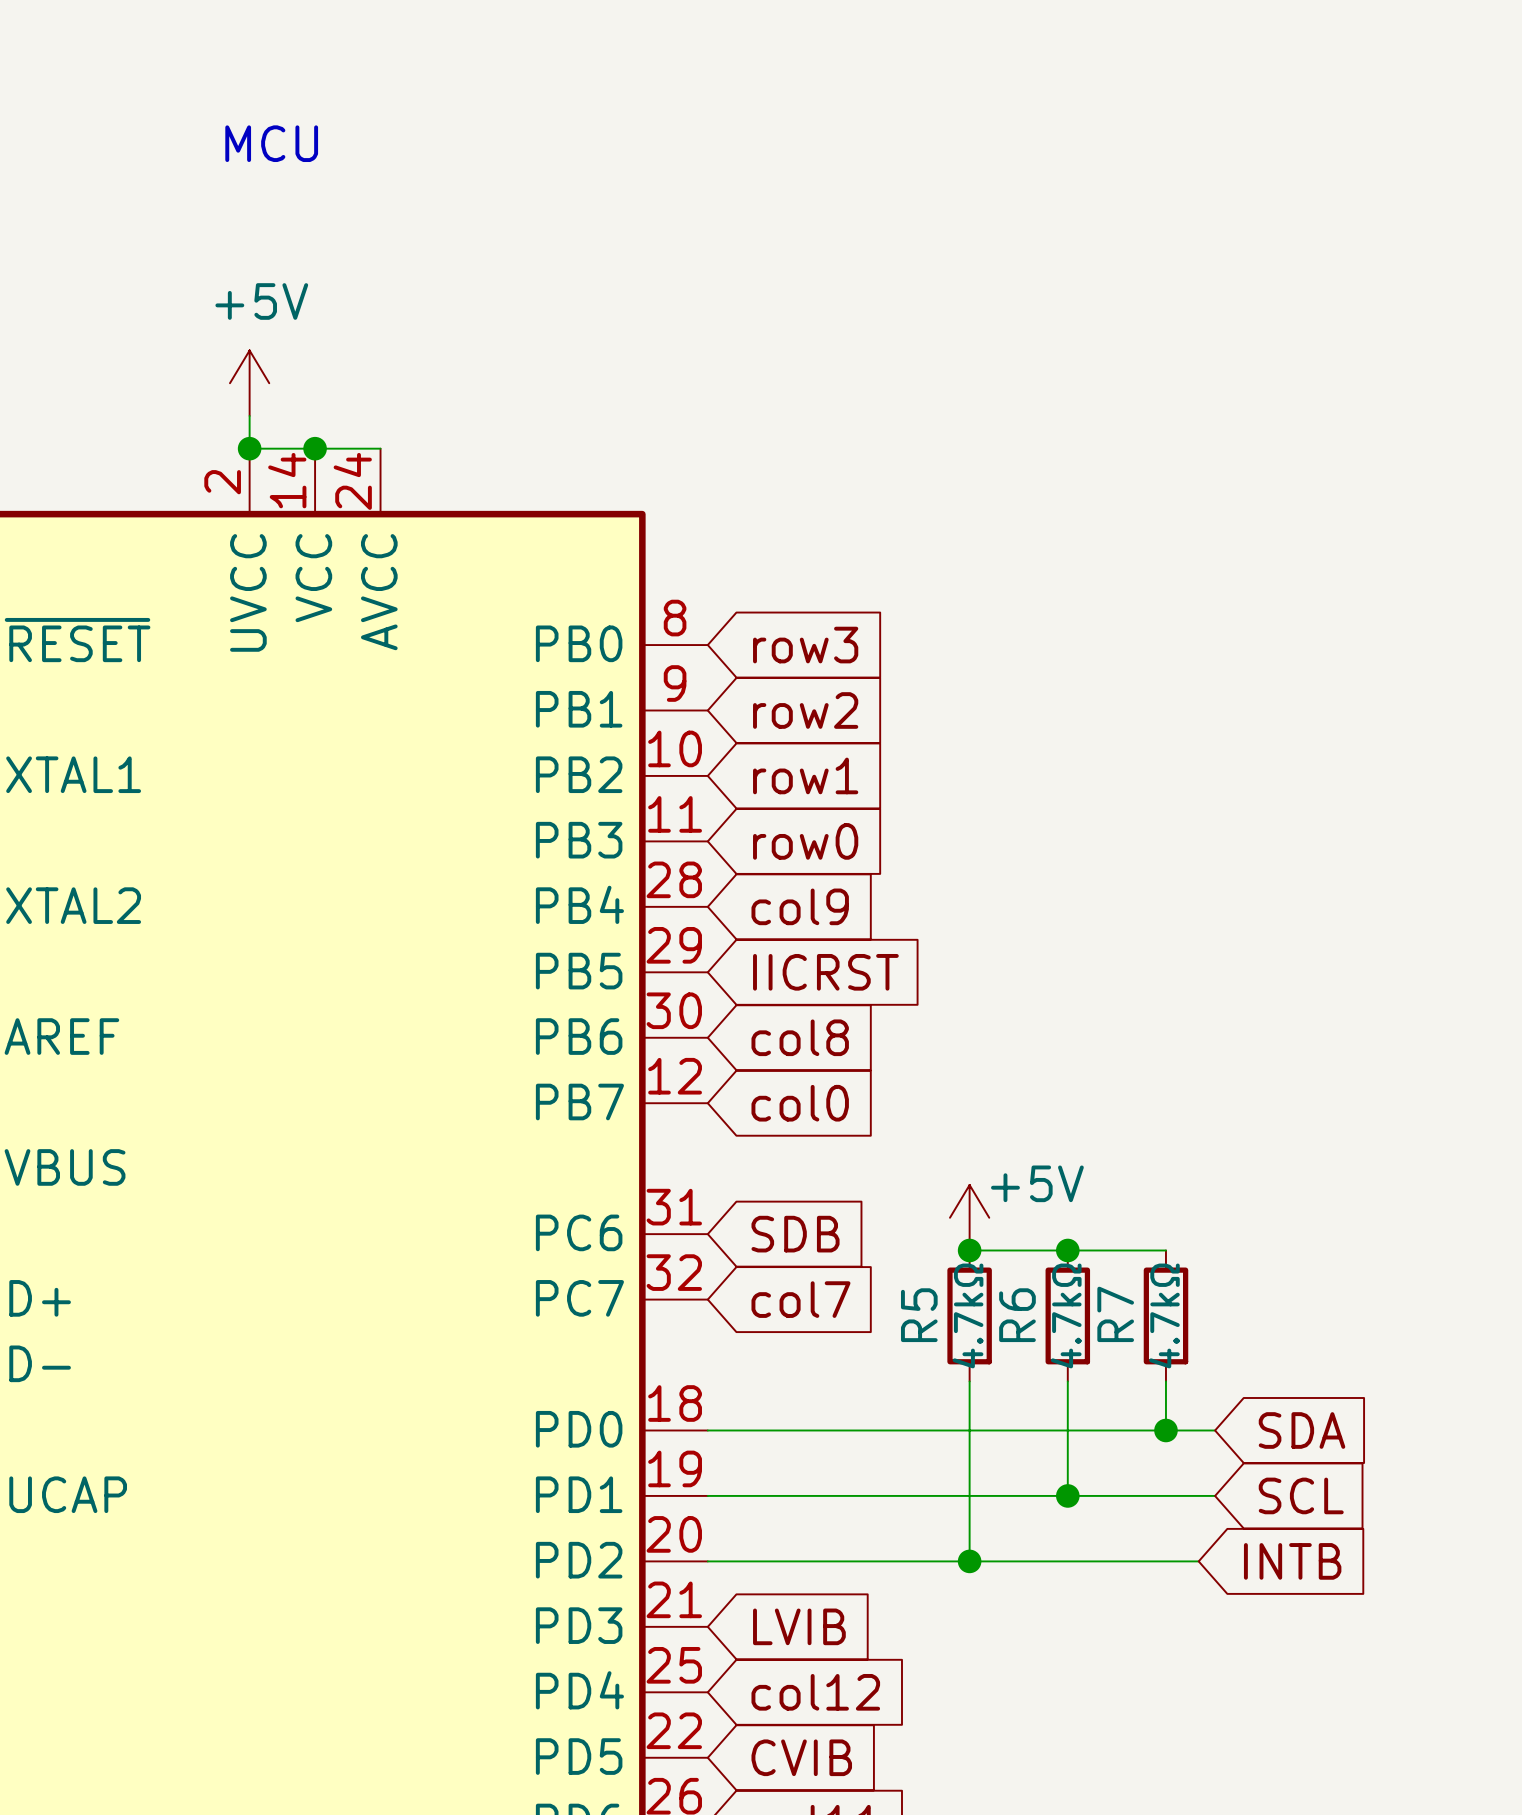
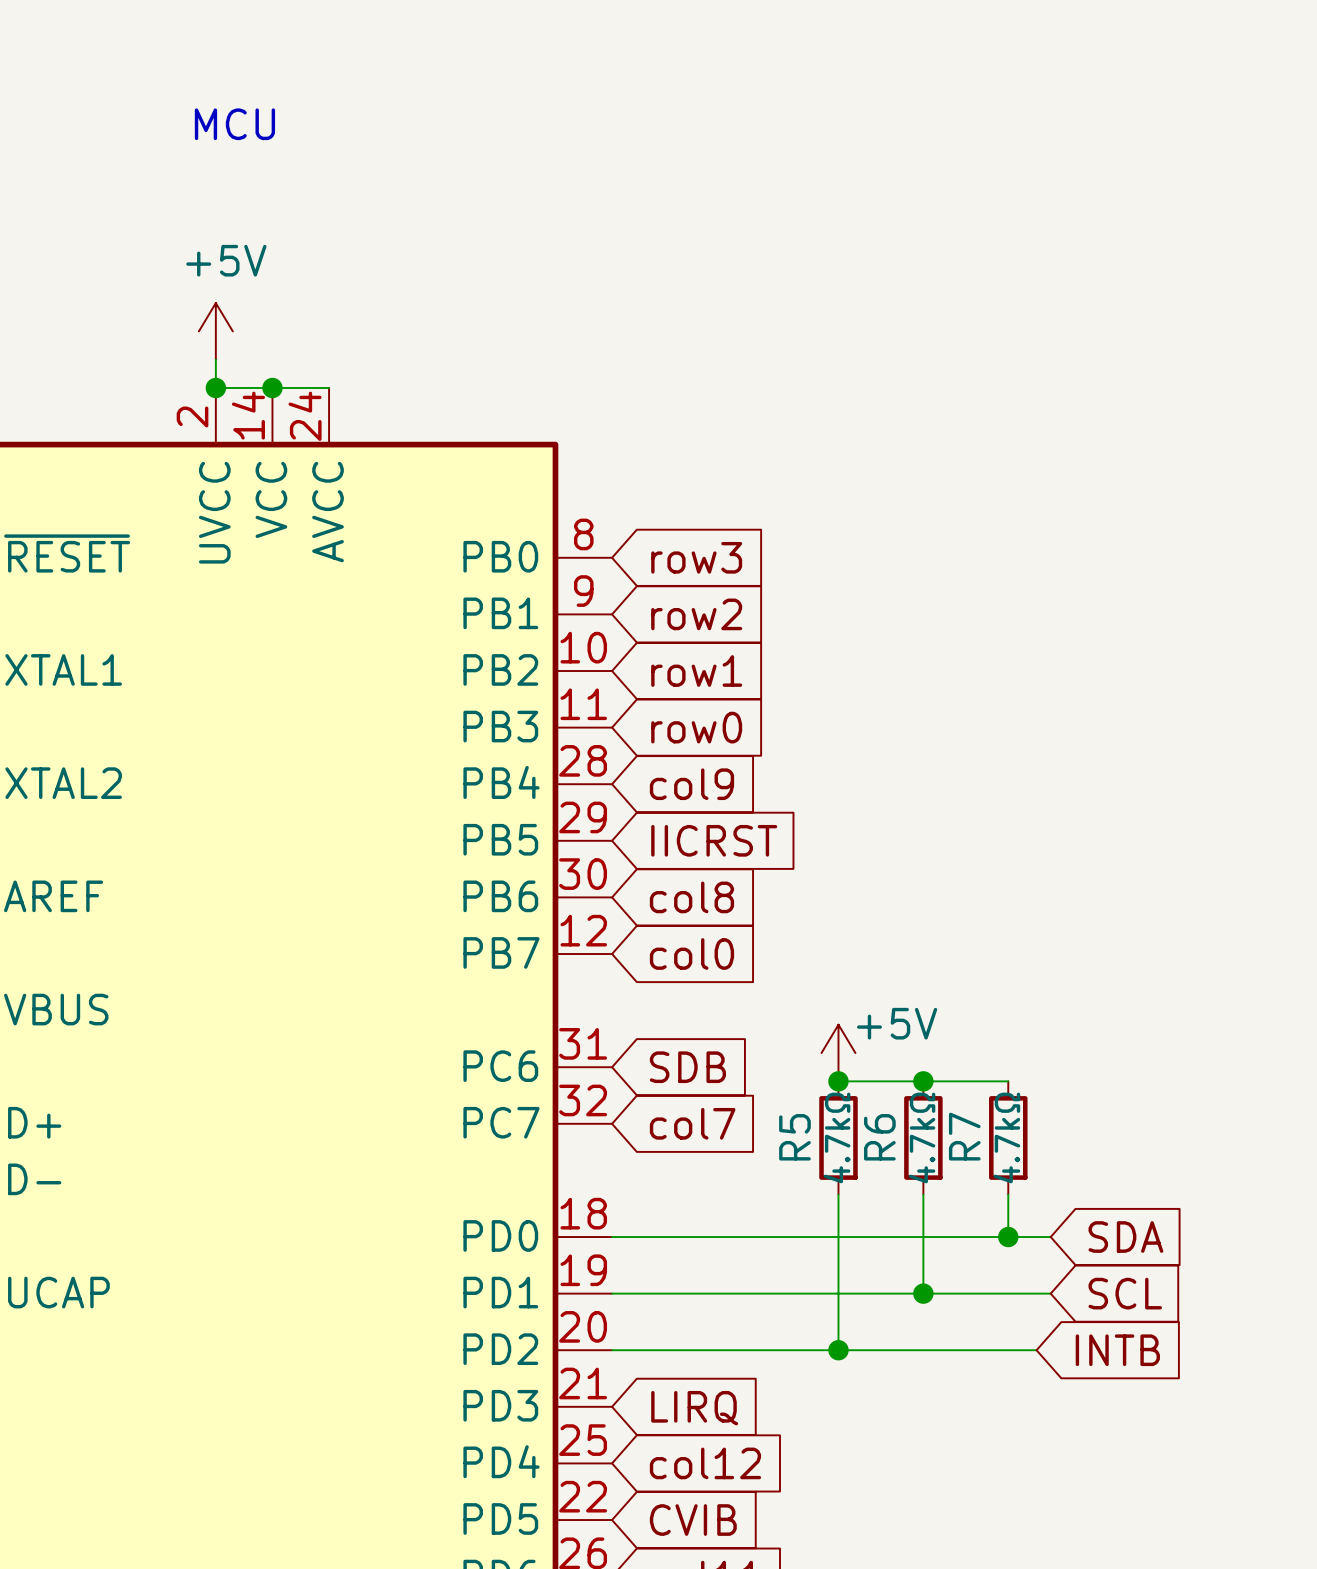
global label: LVIB (799, 1626) -> LIRQ (694, 1408)

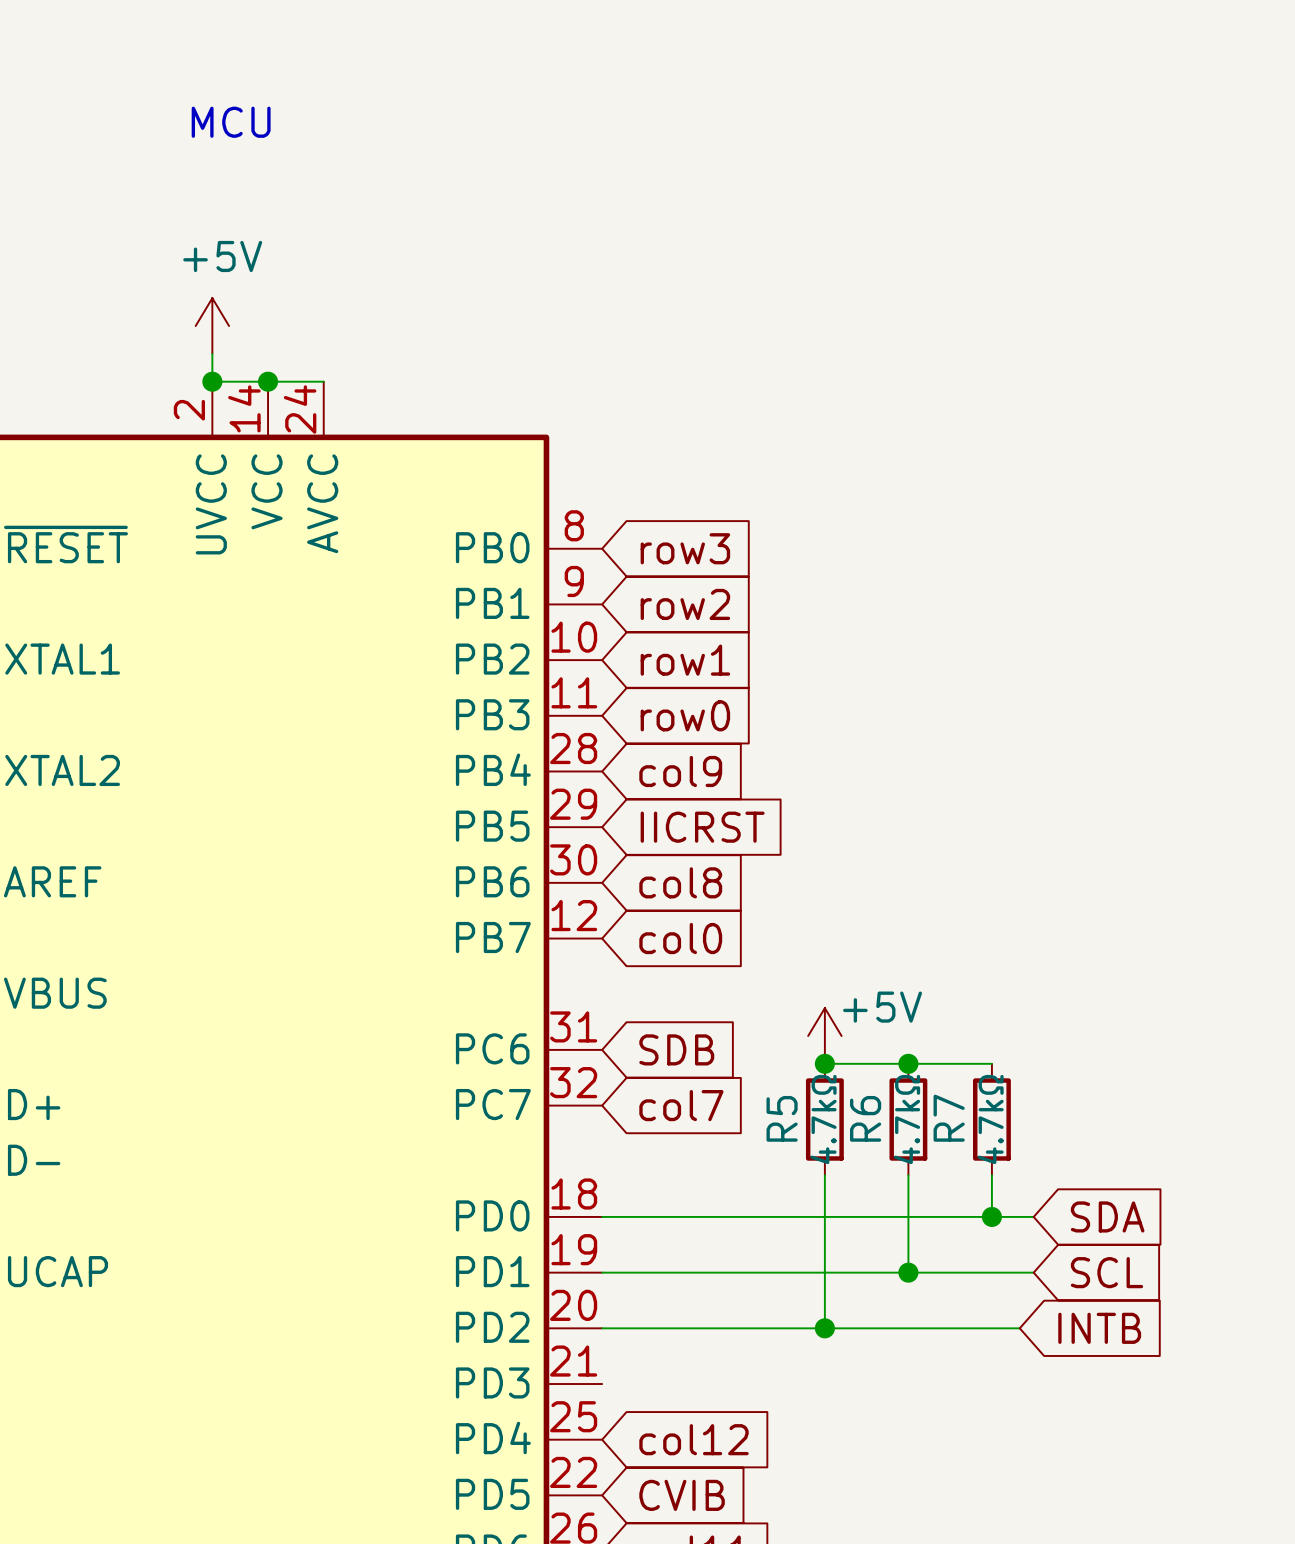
global label: LIRQ (694, 1408) -> none

